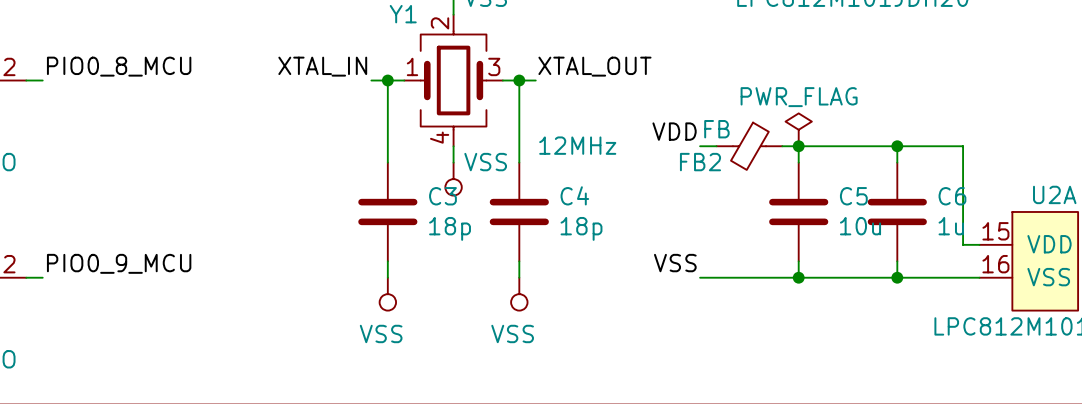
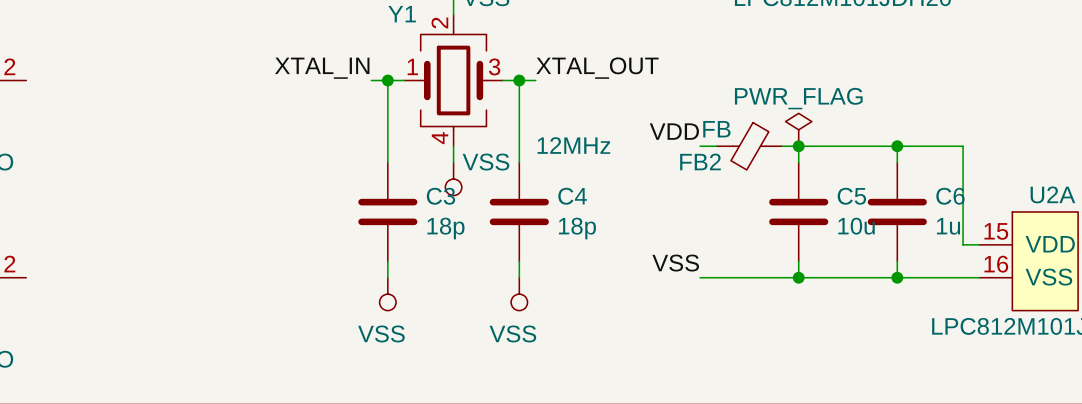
label: PIO0_8_MCU (119, 66) -> none
wire: (26, 80) (42, 80) -> none
label: PIO0_9_MCU (119, 263) -> none
wire: (26, 277) (42, 277) -> none

